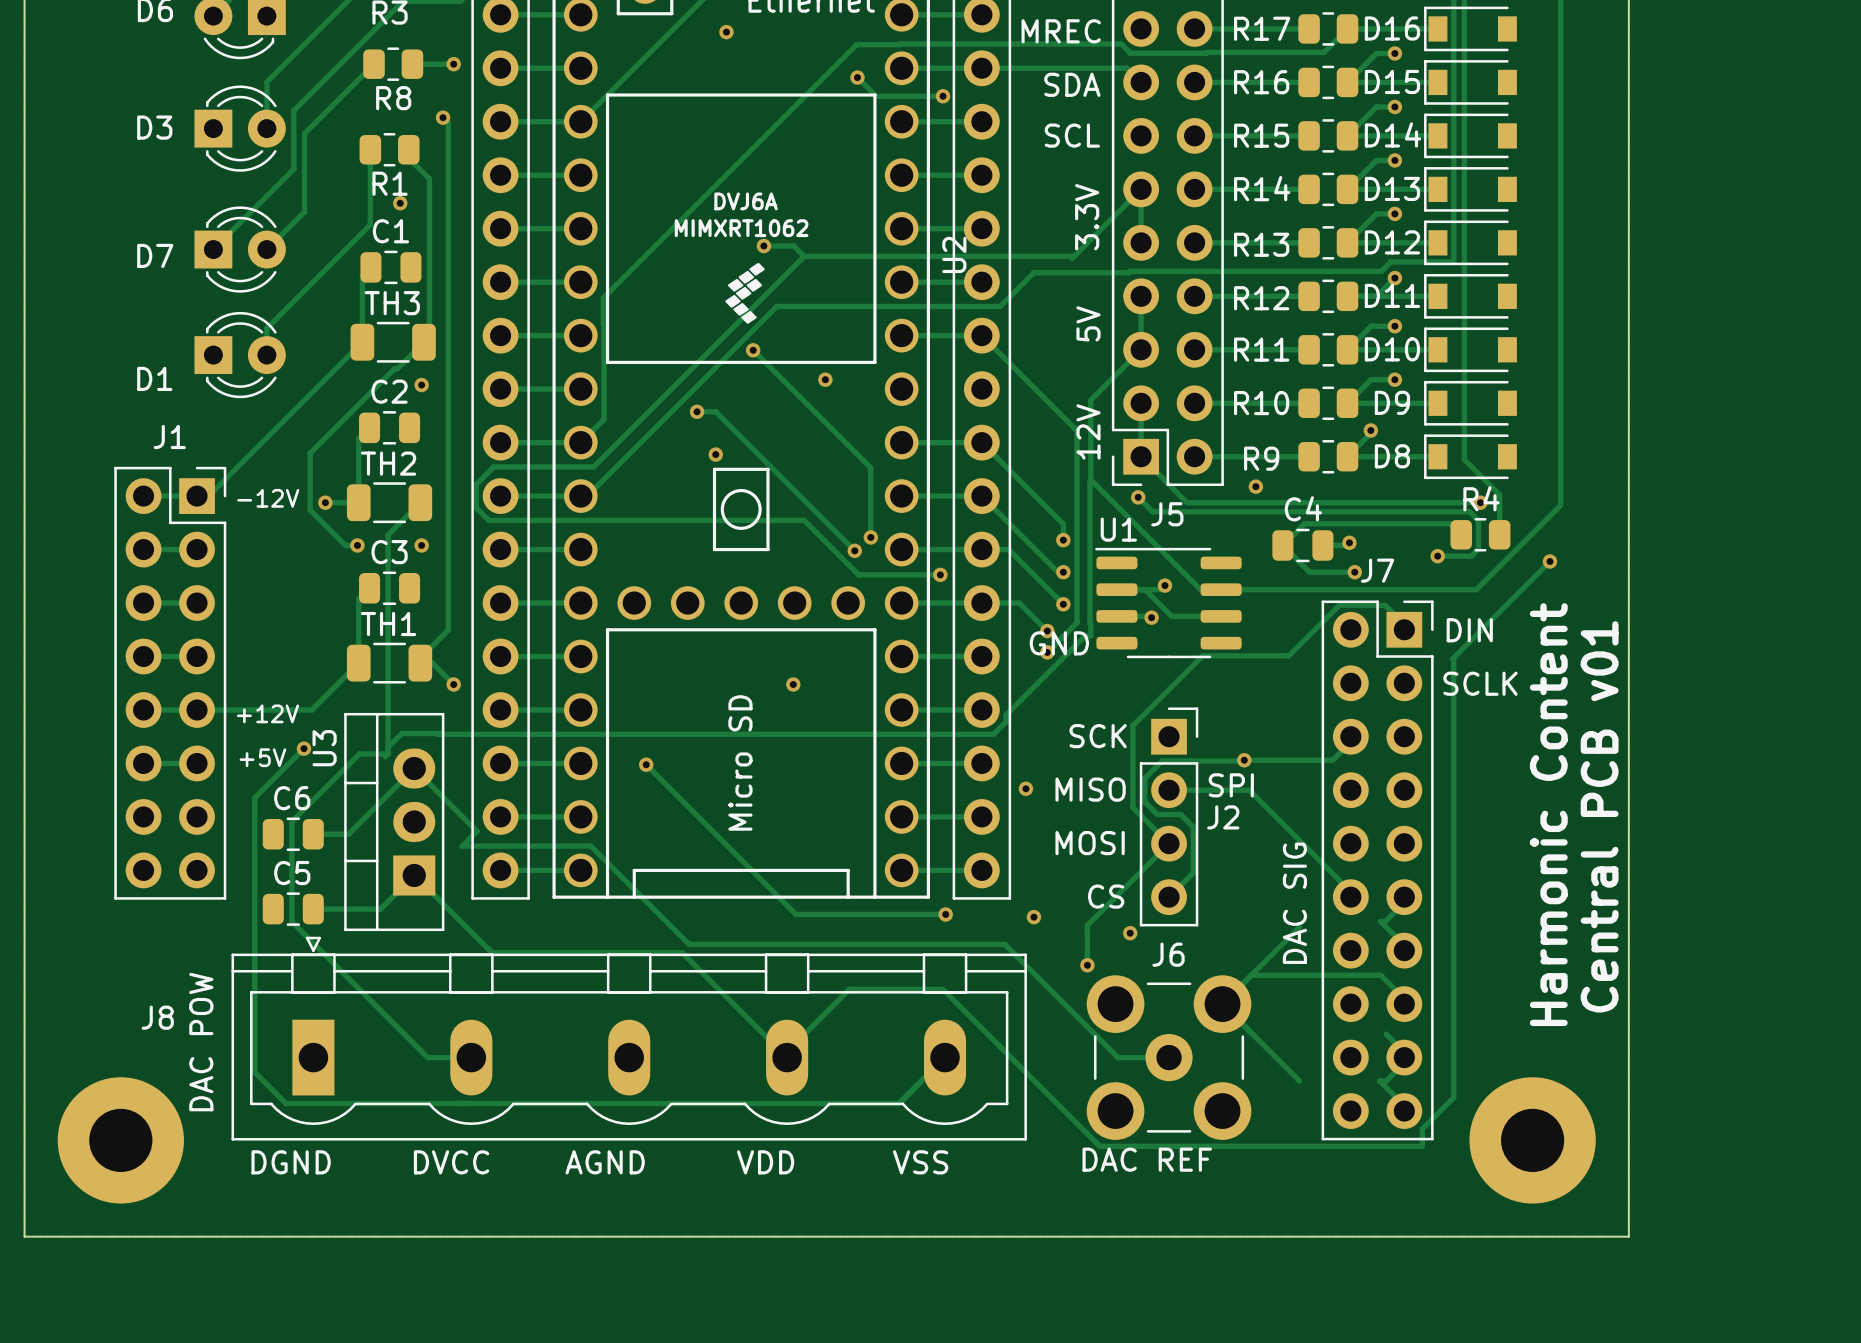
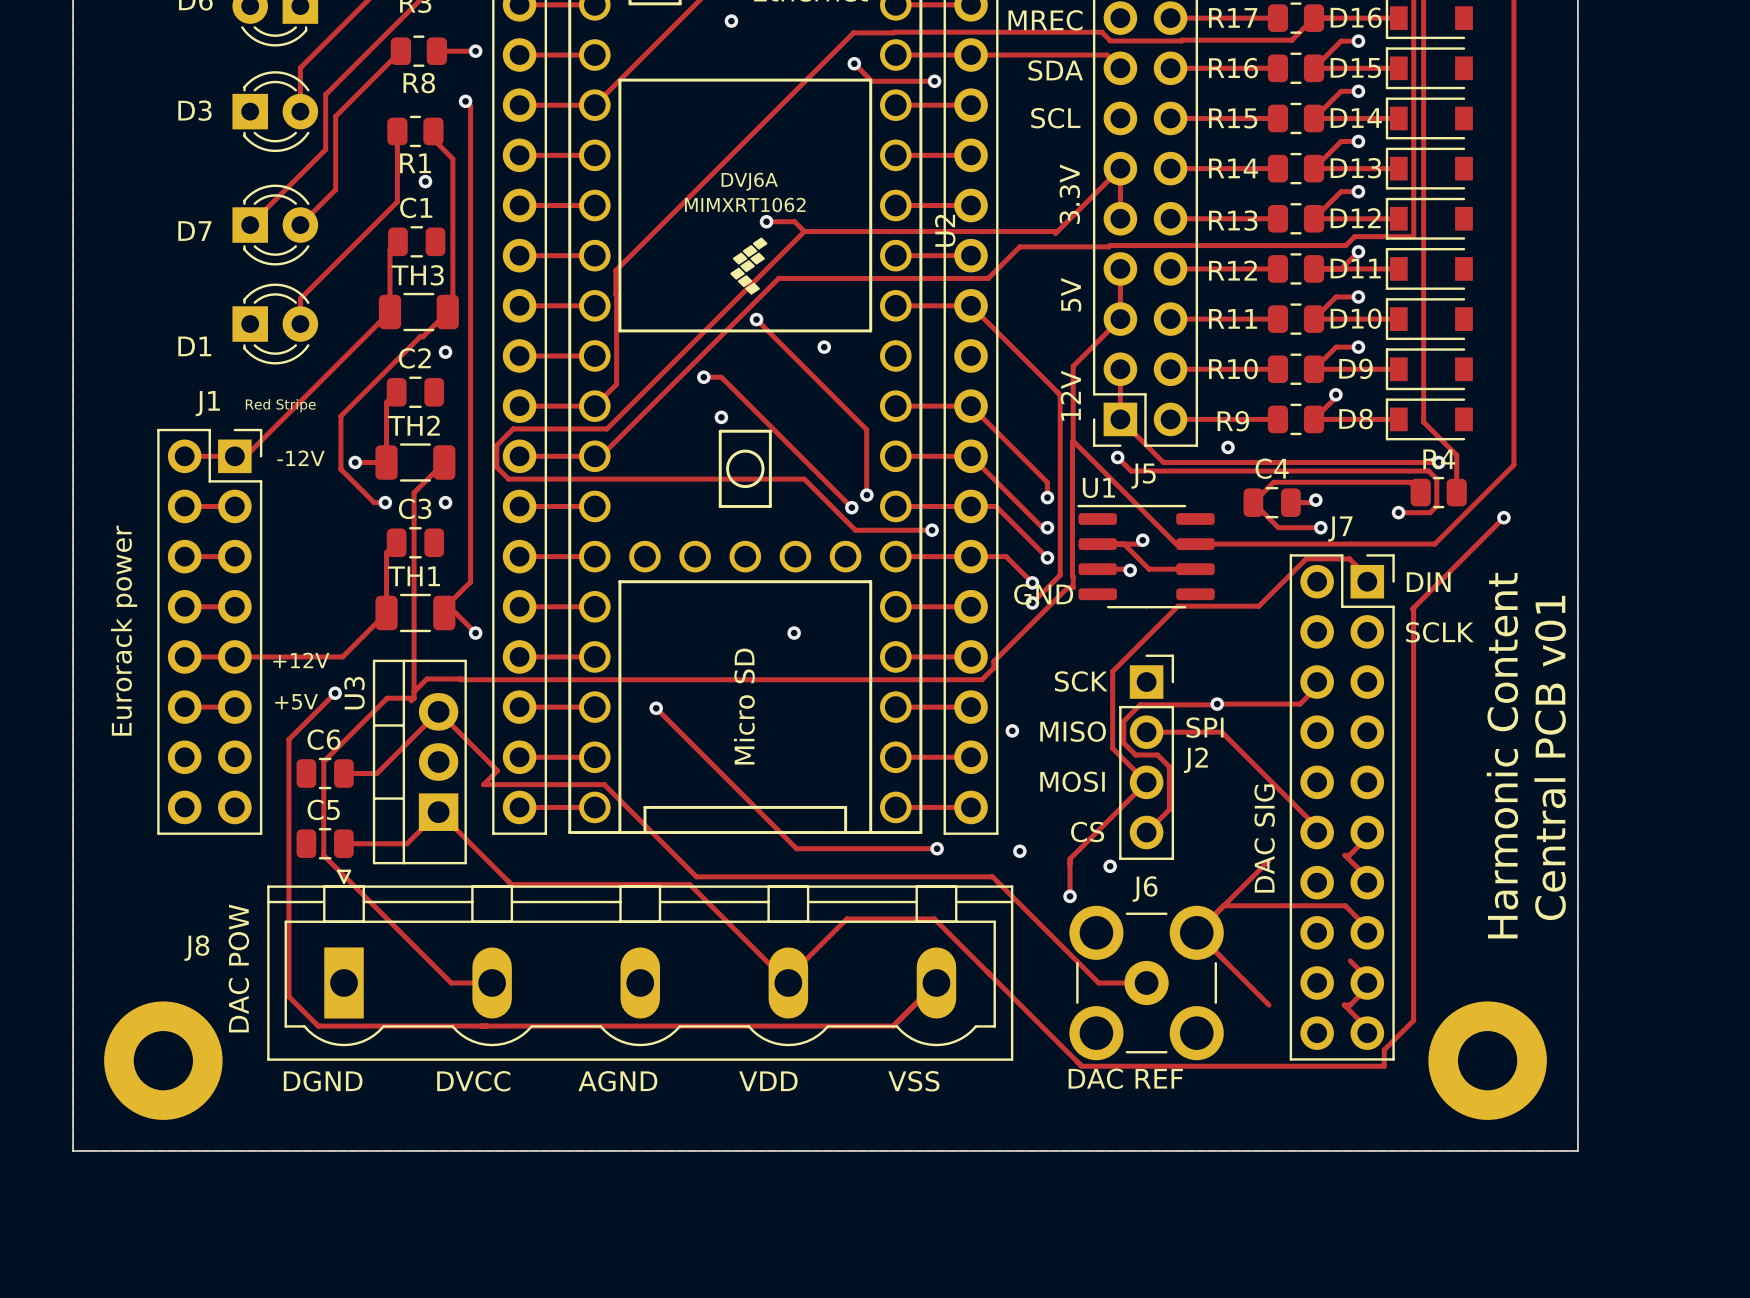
text: none -> Red Stripe (280, 405)
text: none -> Eurorack power (124, 630)

